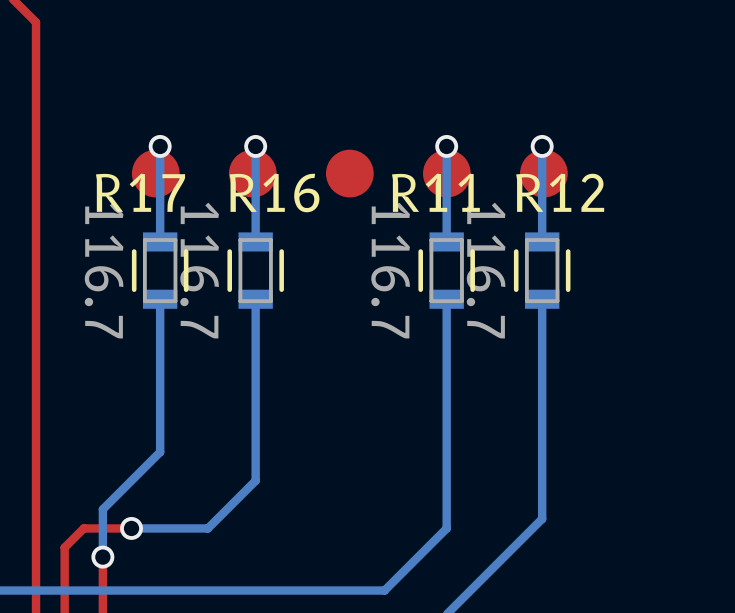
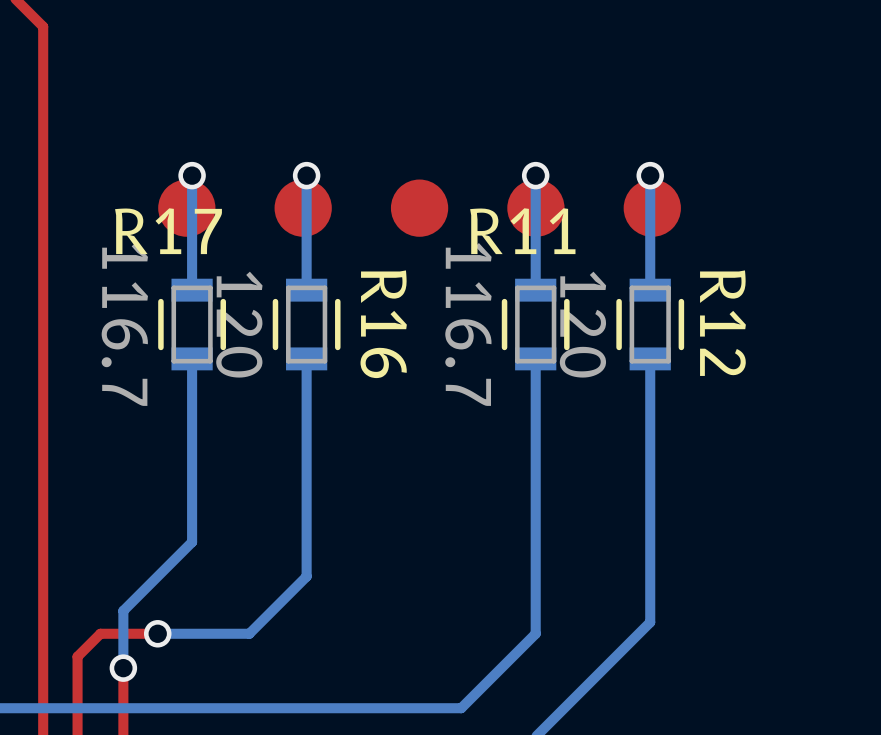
R16 name rotation: 0° (274, 192) -> 90° clockwise (383, 324)
R12 name rotation: 0° (560, 192) -> 90° clockwise (722, 323)
R16 value: 116.7 (199, 270) -> 120 (239, 324)
R12 value: 116.7 (486, 270) -> 120 (582, 324)

